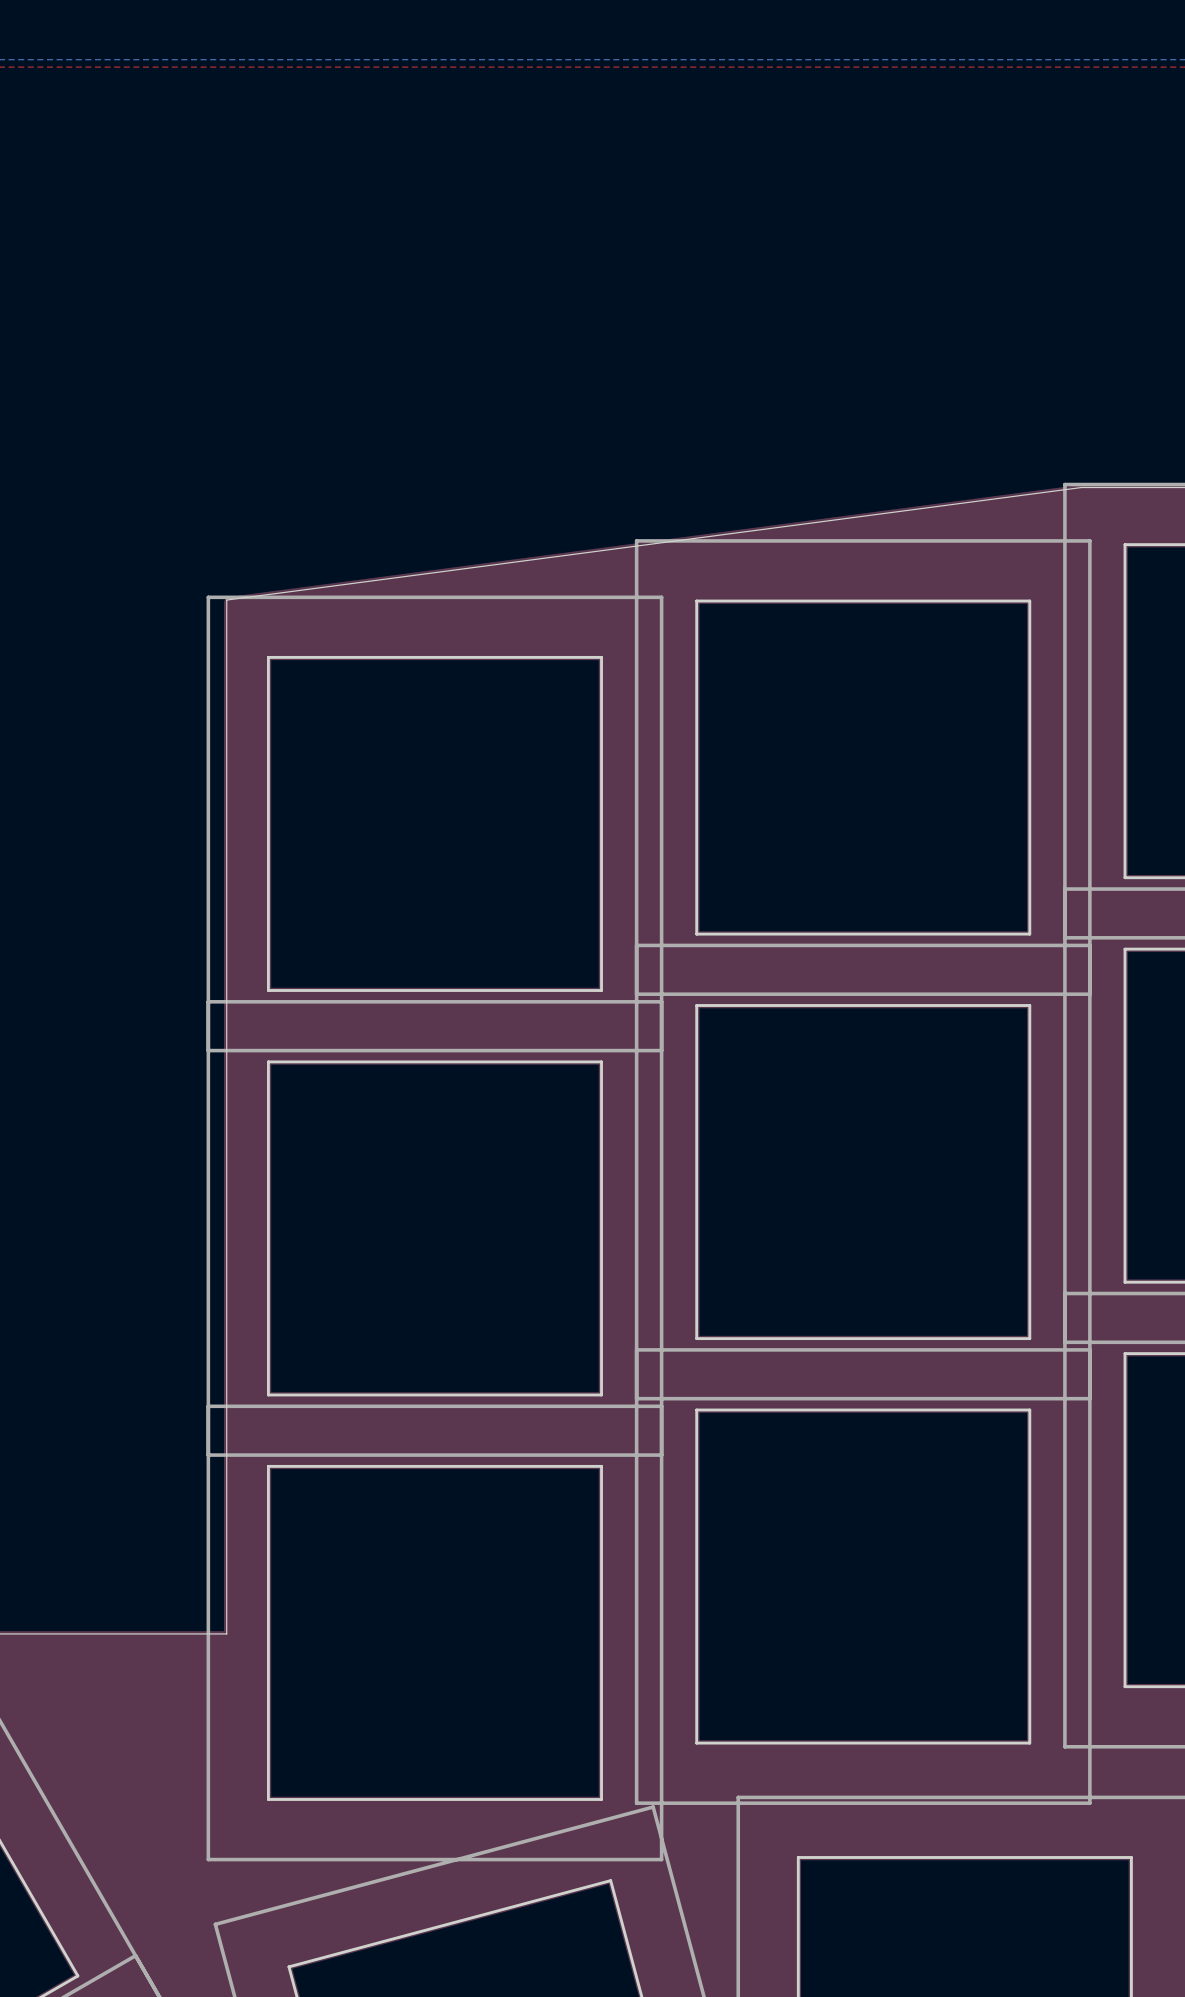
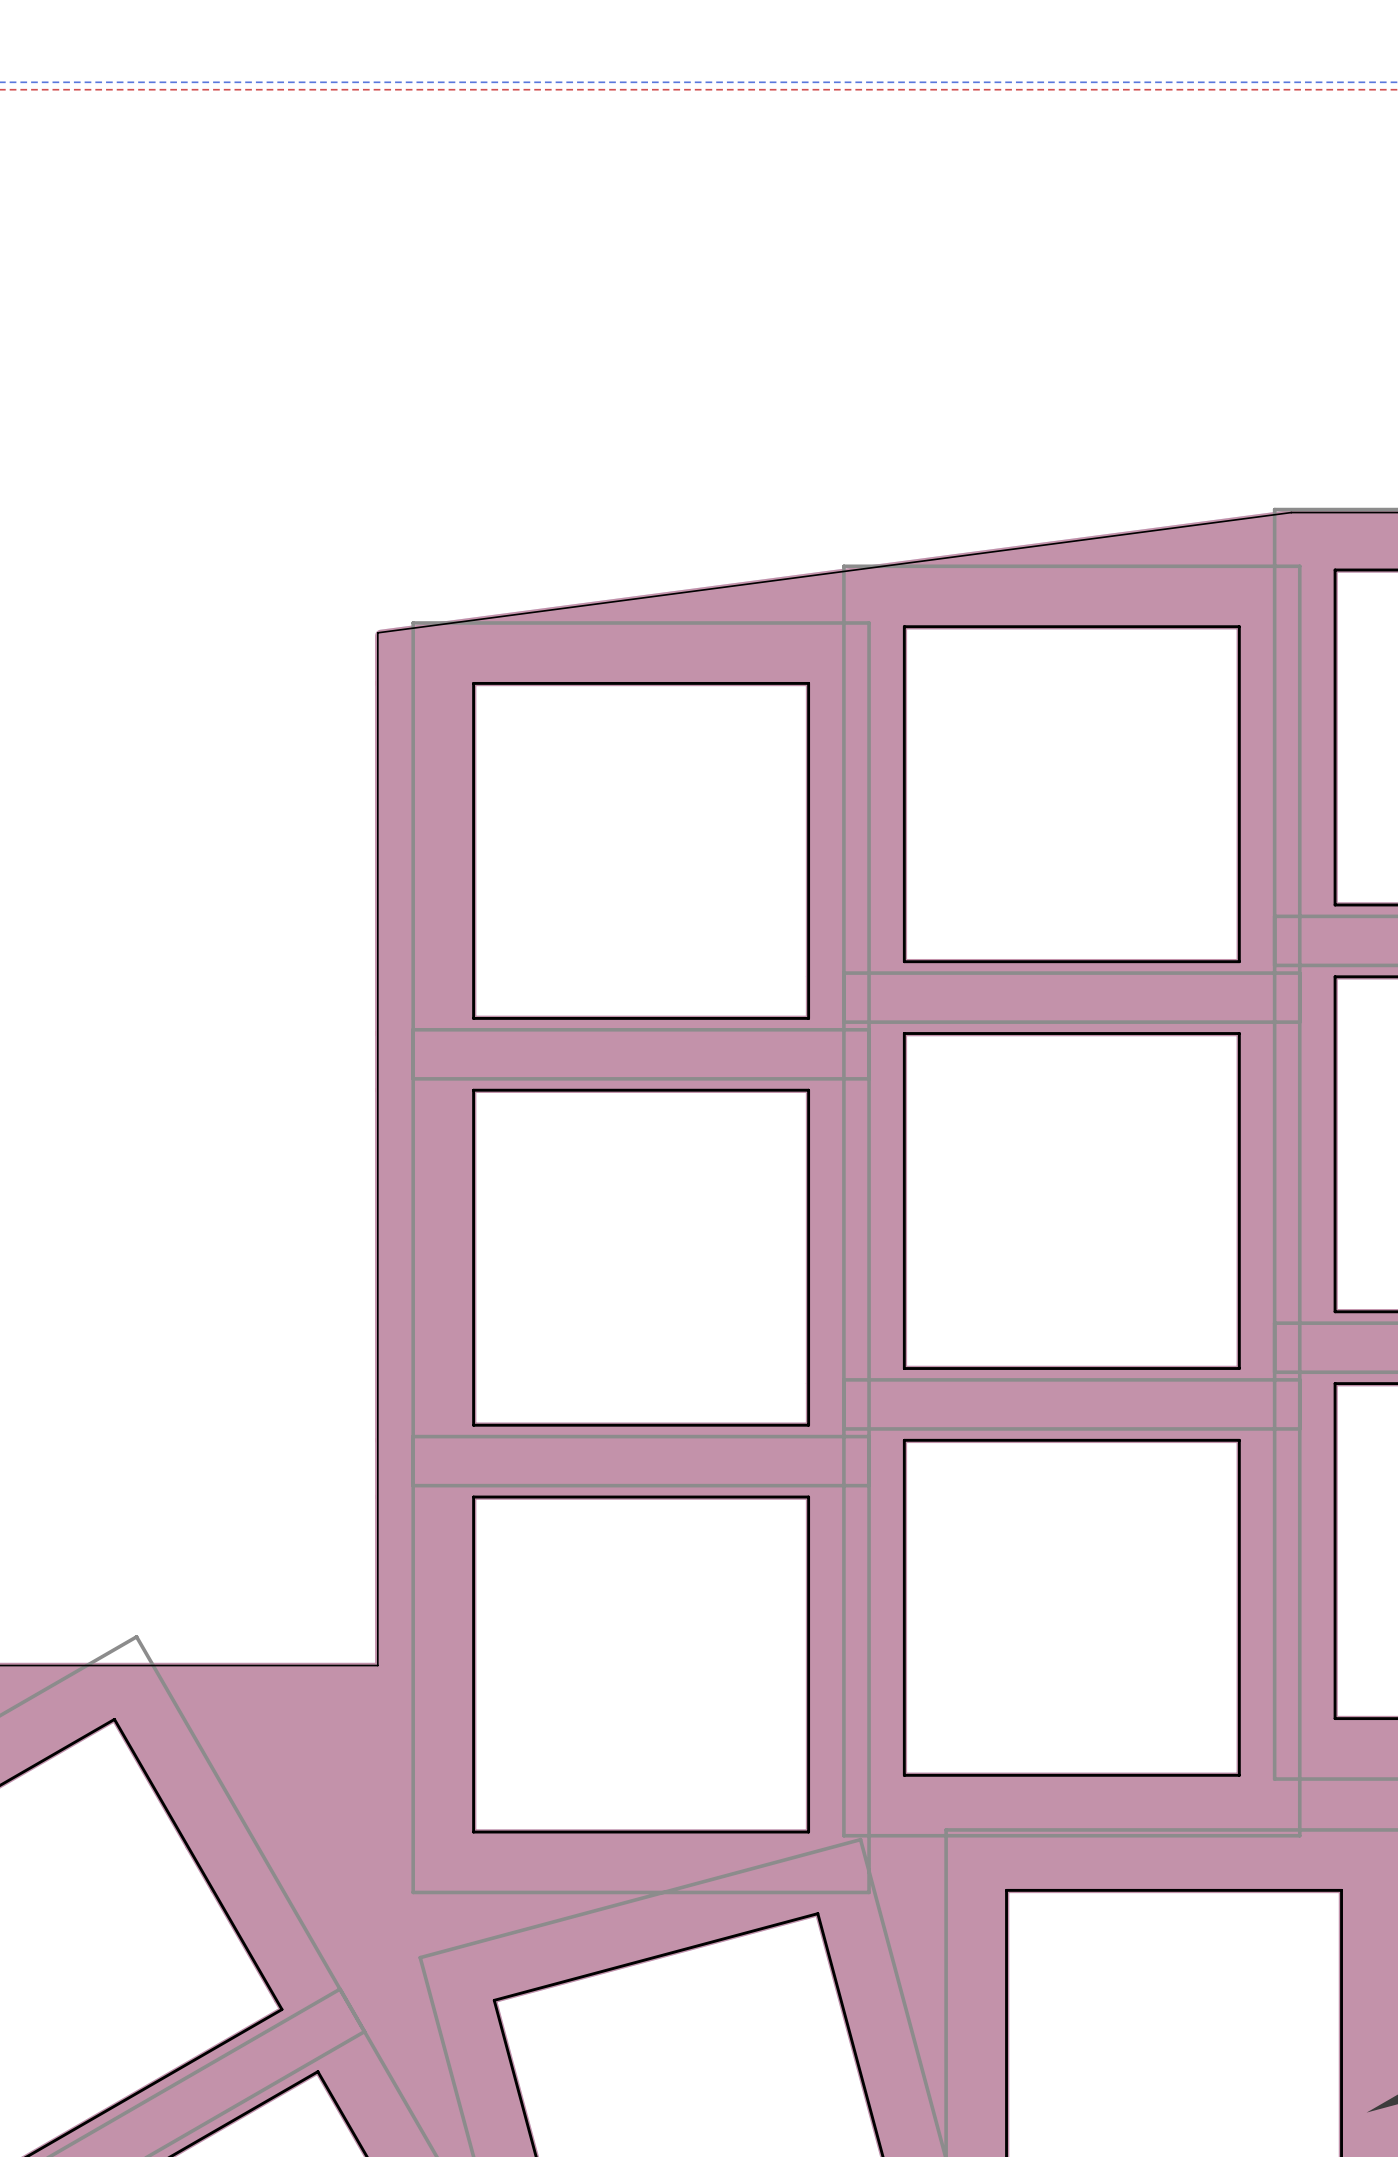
board edge: (226, 600) (226, 1633) (173, 1633) -> (431, 625) (377, 632) (377, 1665)

